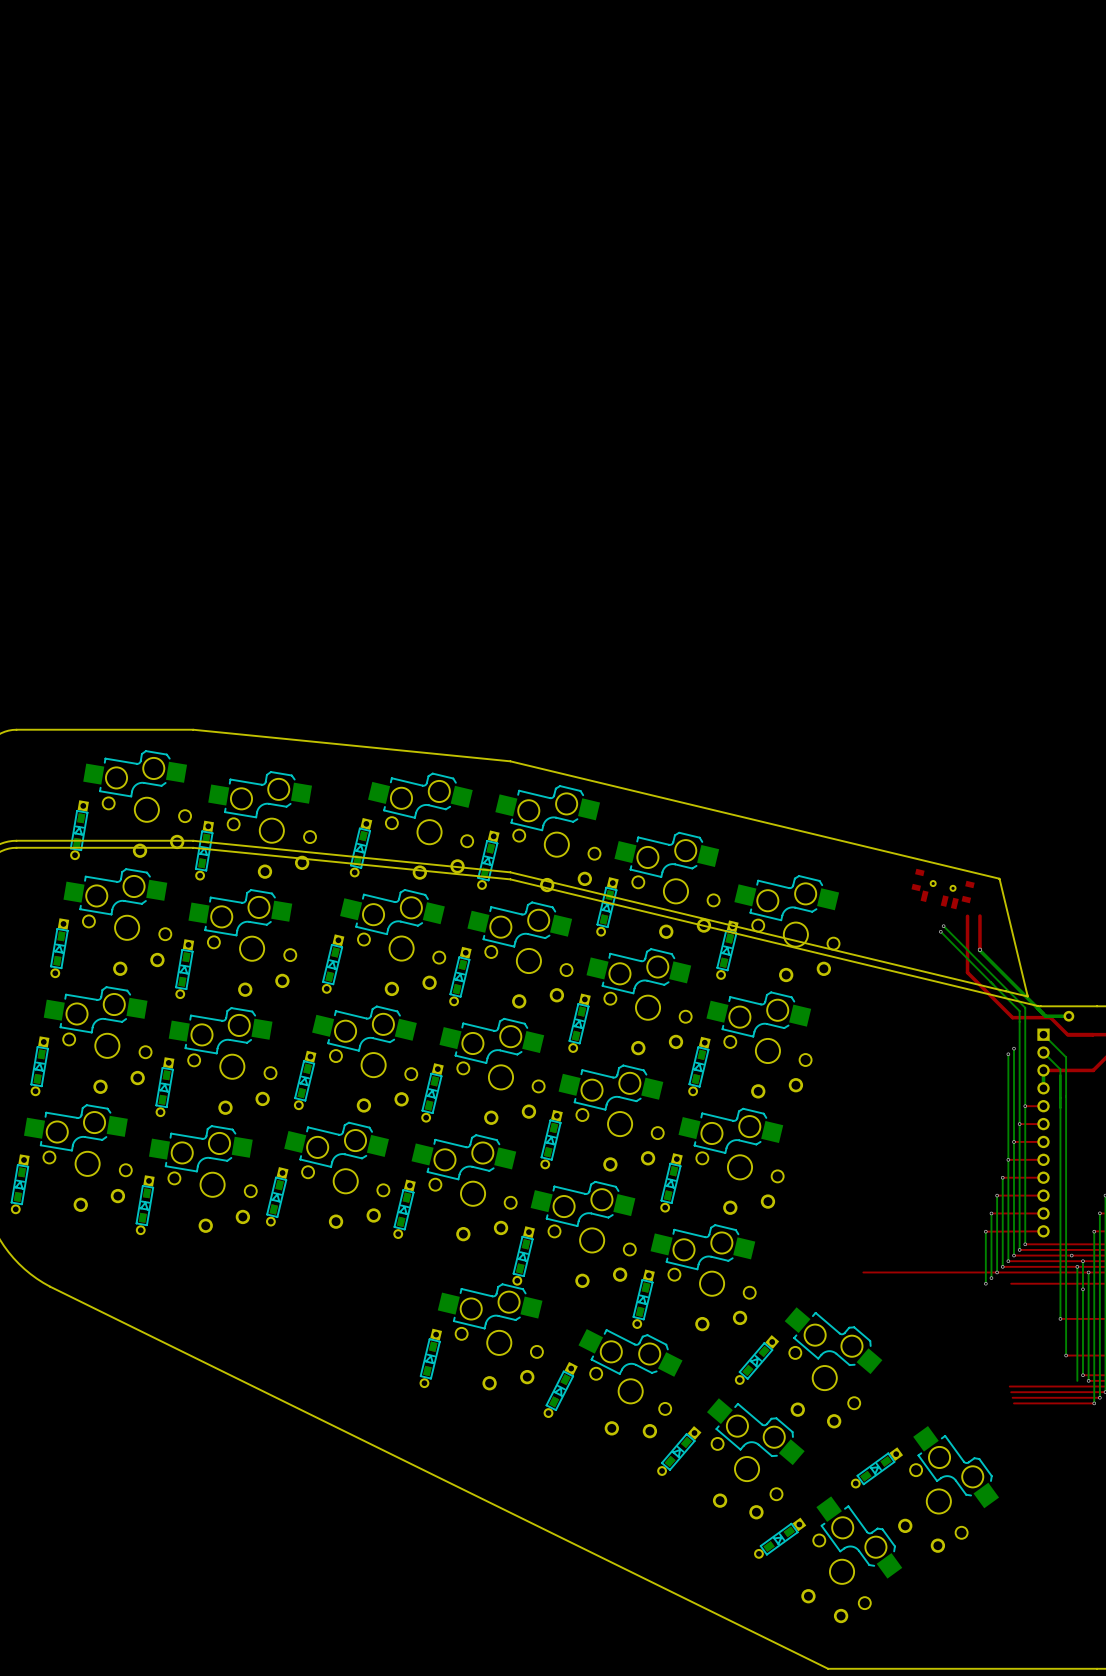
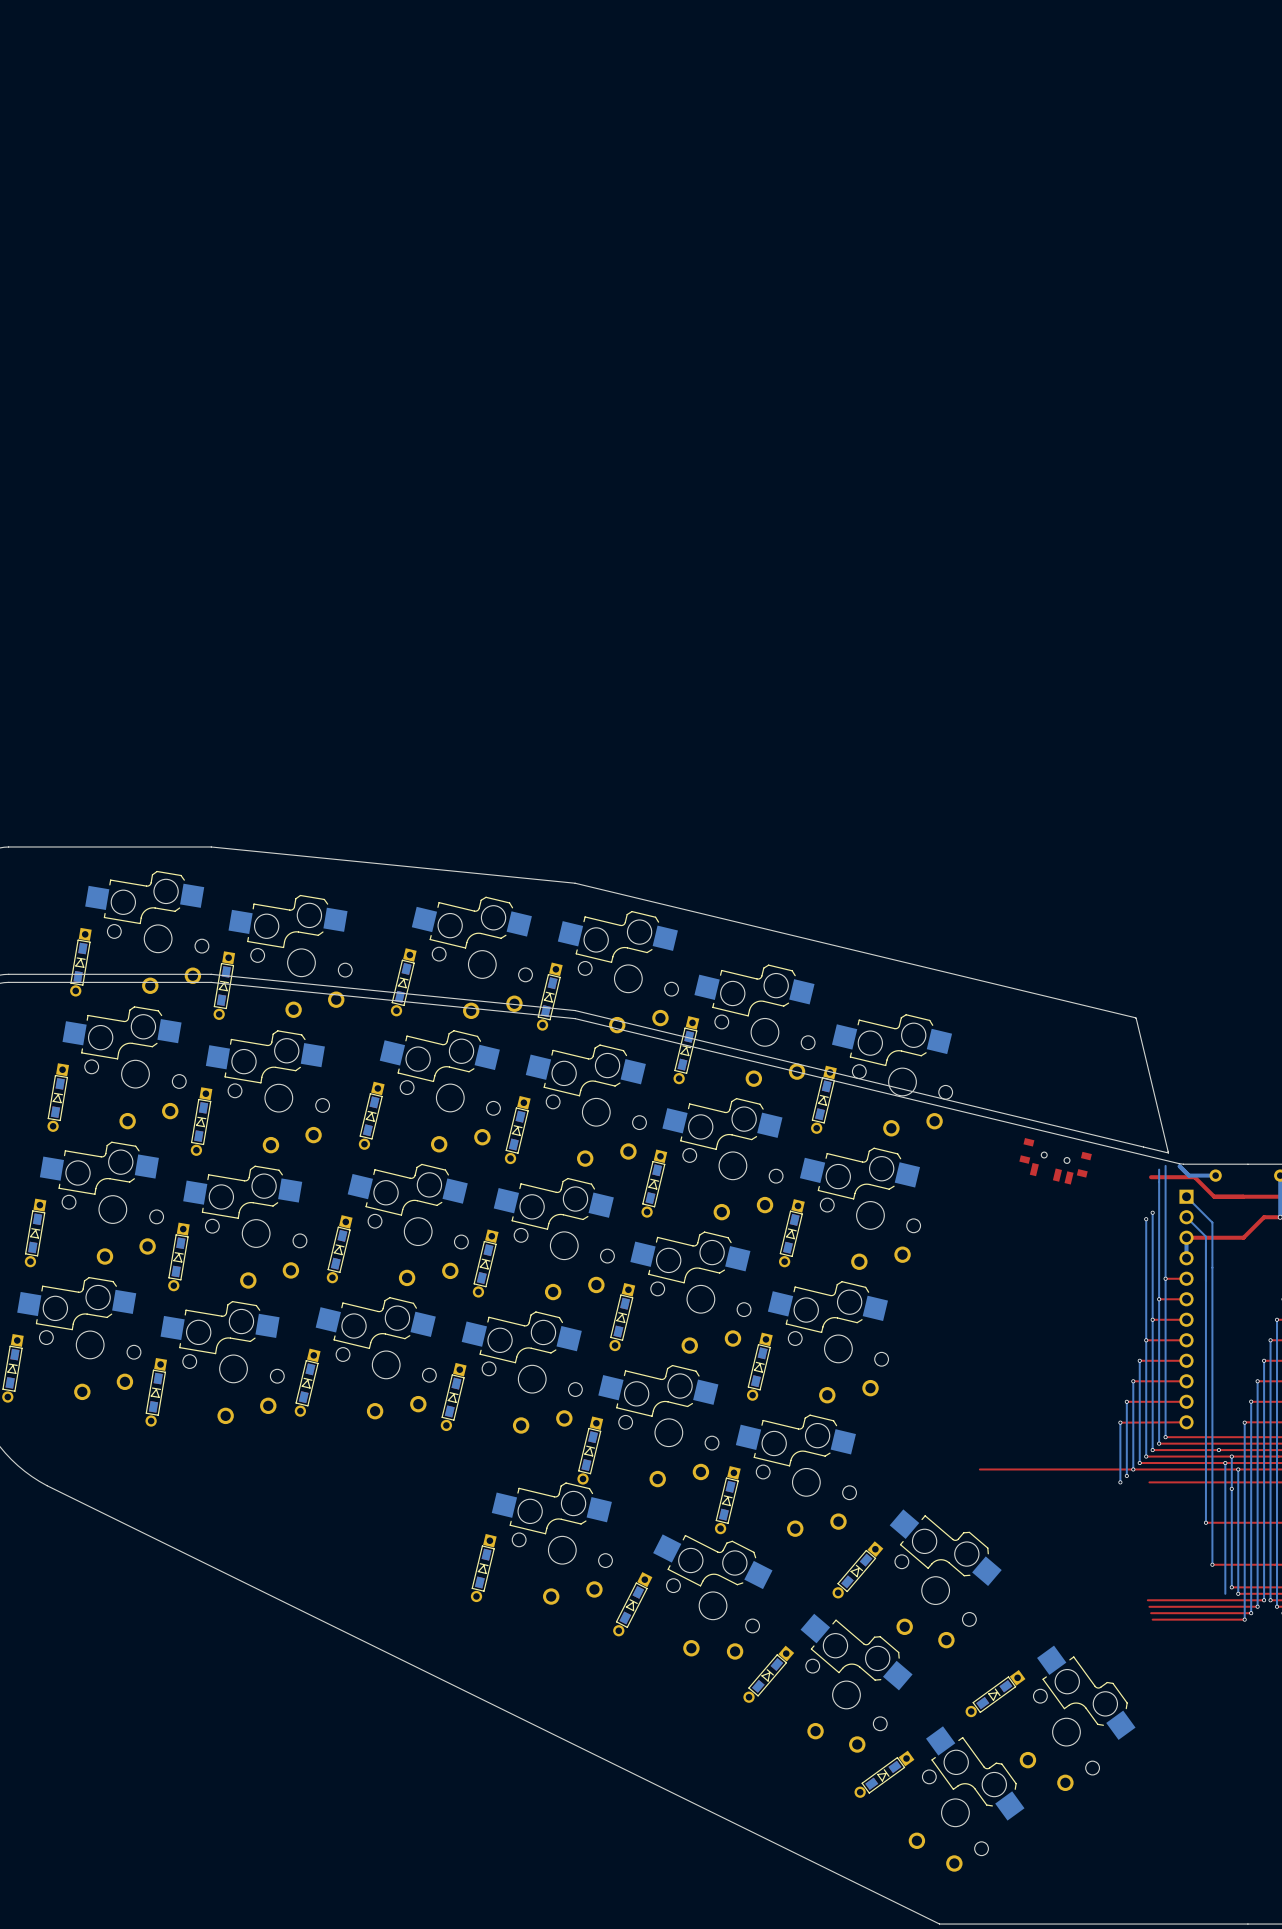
part position: (943, 889) -> (1055, 1161)
top track: (967, 916) (967, 972) (1012, 1017) -> none
top track: (979, 916) (979, 949) -> none
bottom track: (943, 926) (1025, 1007) -> none
via: (943, 926) -> none
bottom track: (940, 931) (1019, 1011) -> none
via: (940, 931) -> none
bottom track: (979, 949) (1037, 1008) -> none
via: (979, 949) -> none

